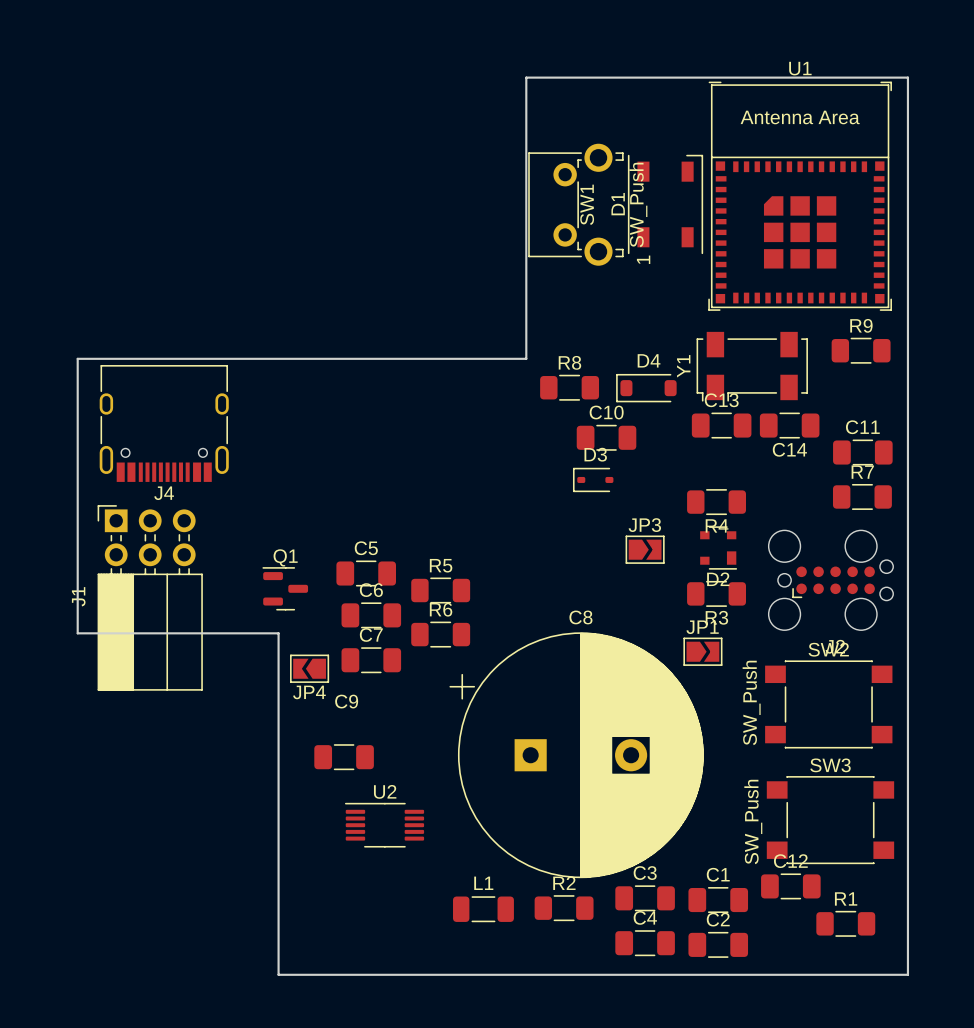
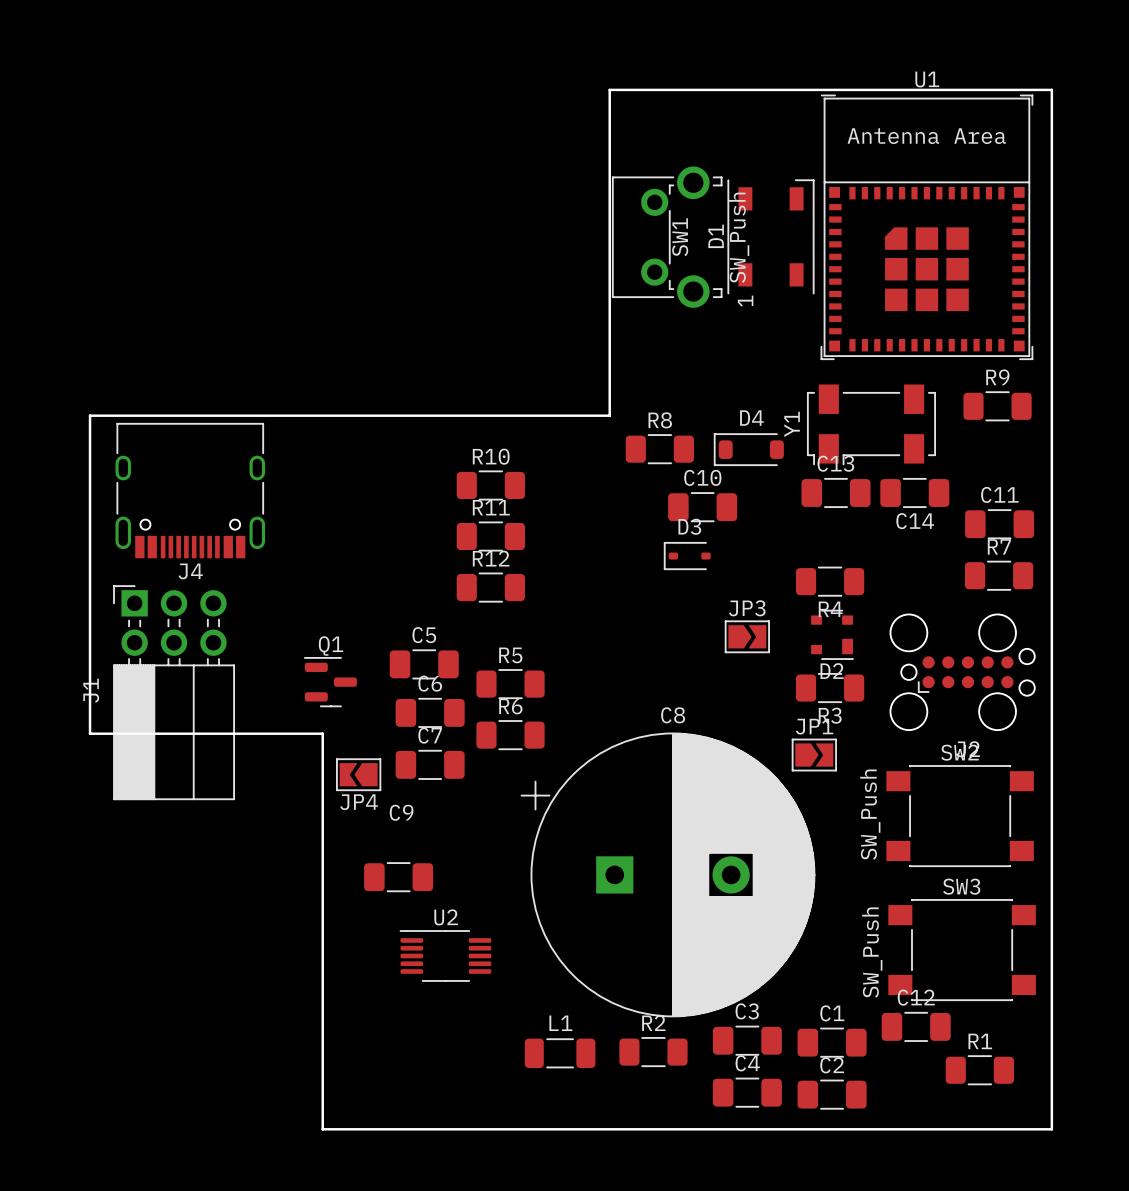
R10: none -> (490, 485)
R11: none -> (490, 536)
R12: none -> (490, 587)

